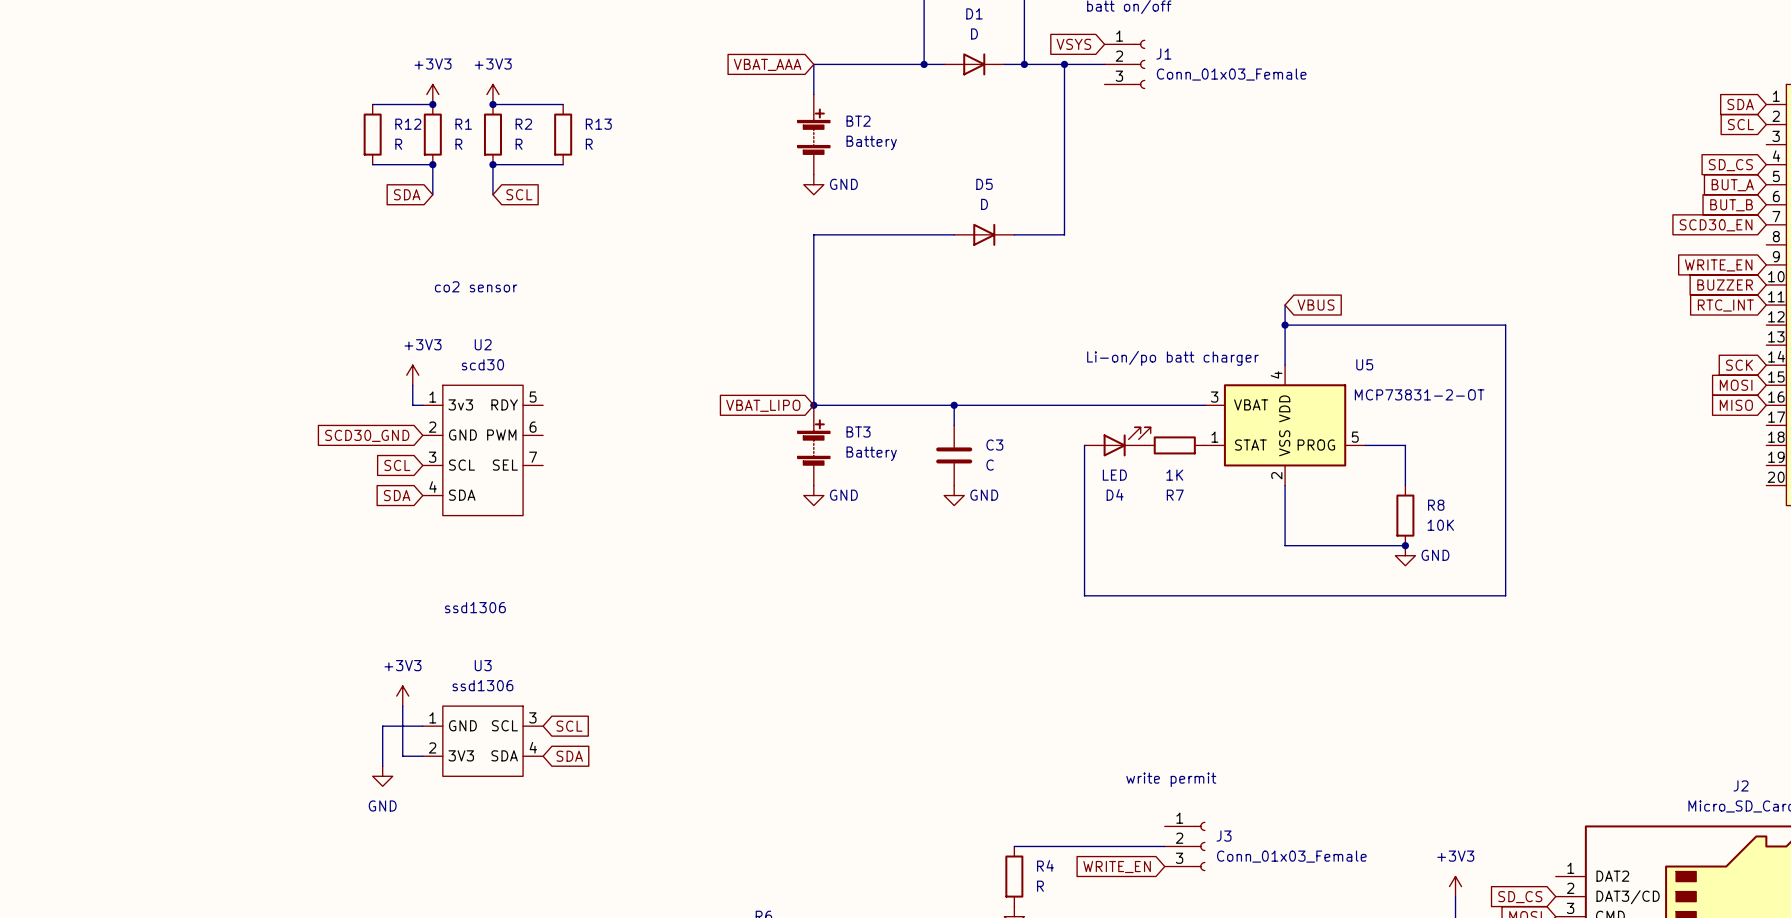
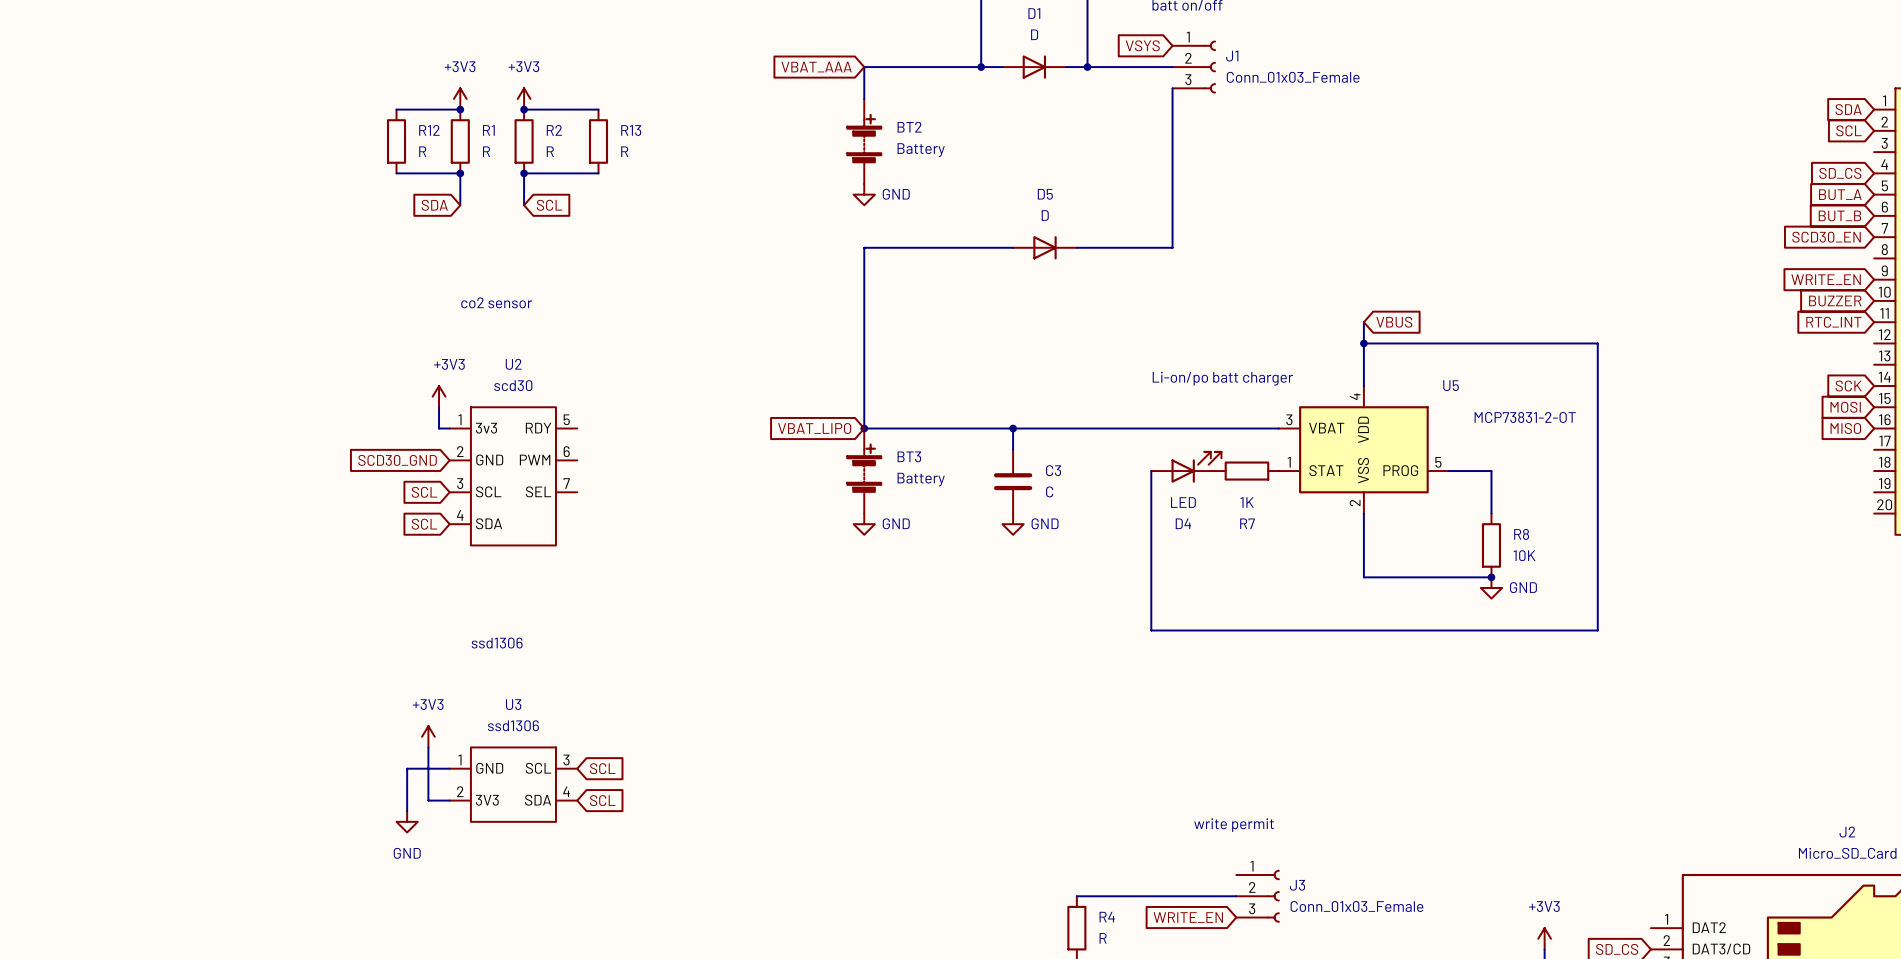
wire: (1064, 64) (1064, 234) -> (1172, 88) (1172, 247) (1130, 247)
junction: (1064, 64) -> none
global label: SDA (397, 495) -> SCL (424, 524)
global label: SDA (569, 756) -> SCL (602, 800)

